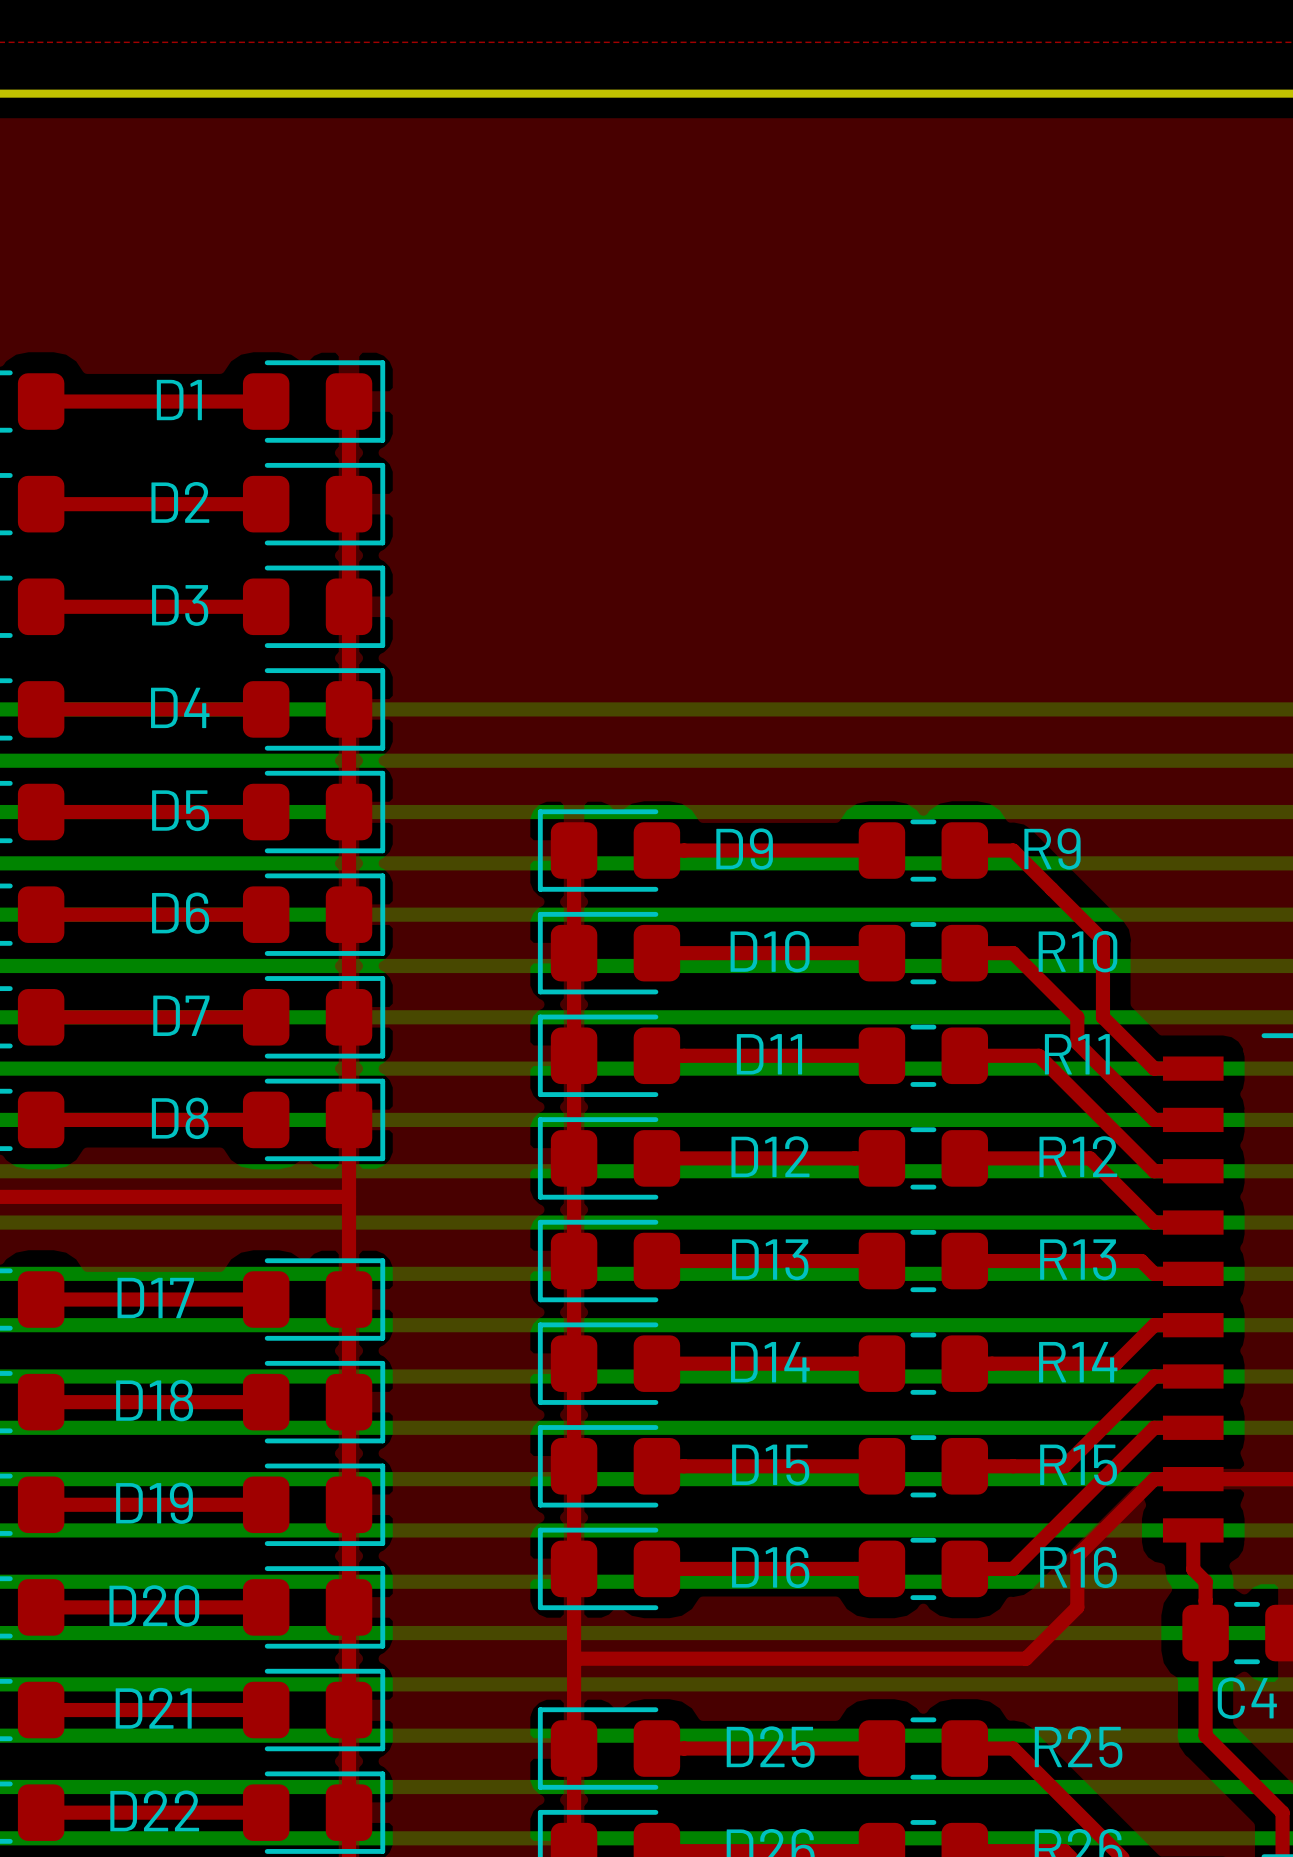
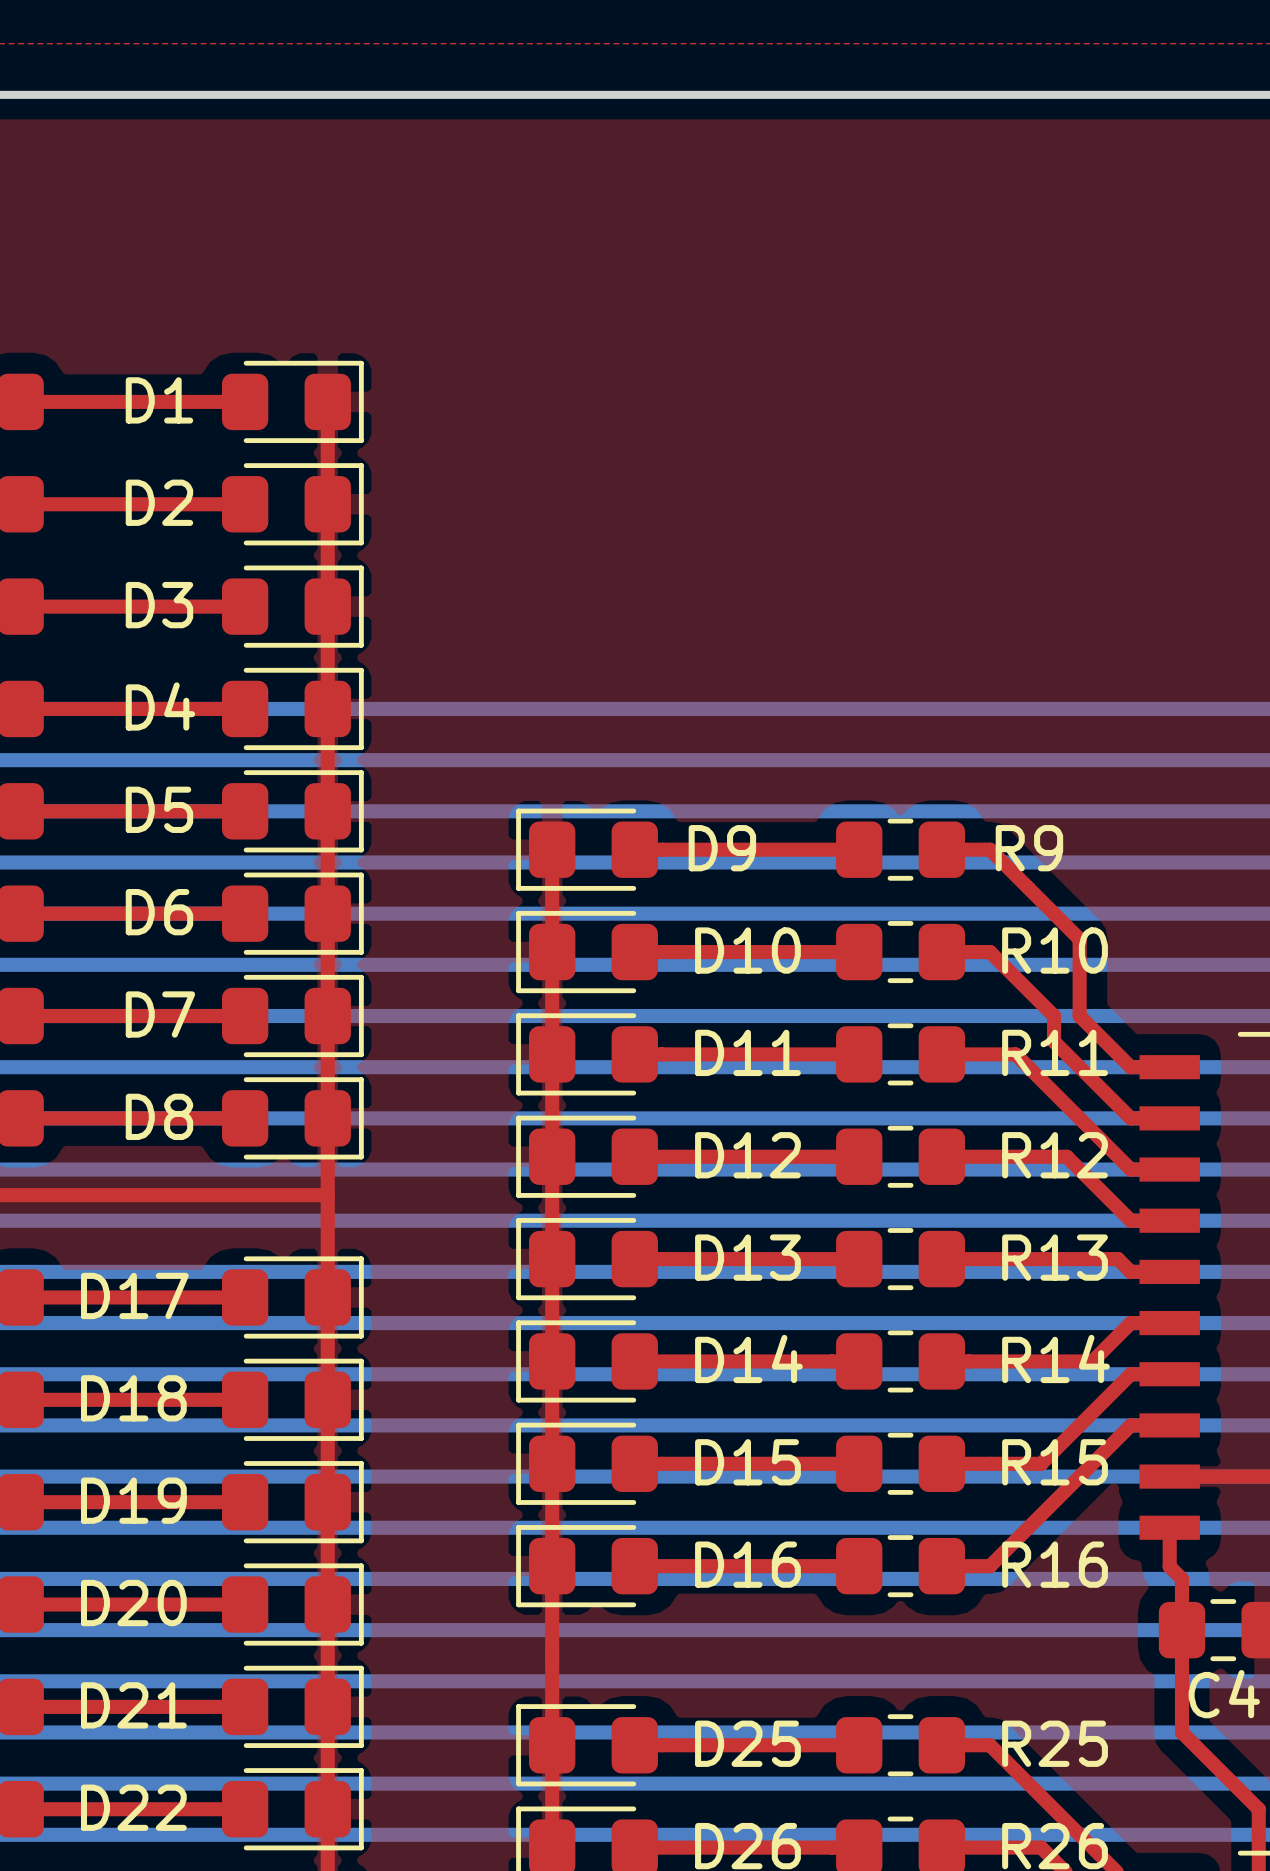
top track: (1193, 1479) (1154, 1479) (1077, 1556) (1077, 1607) (1025, 1658) (574, 1658) -> none

